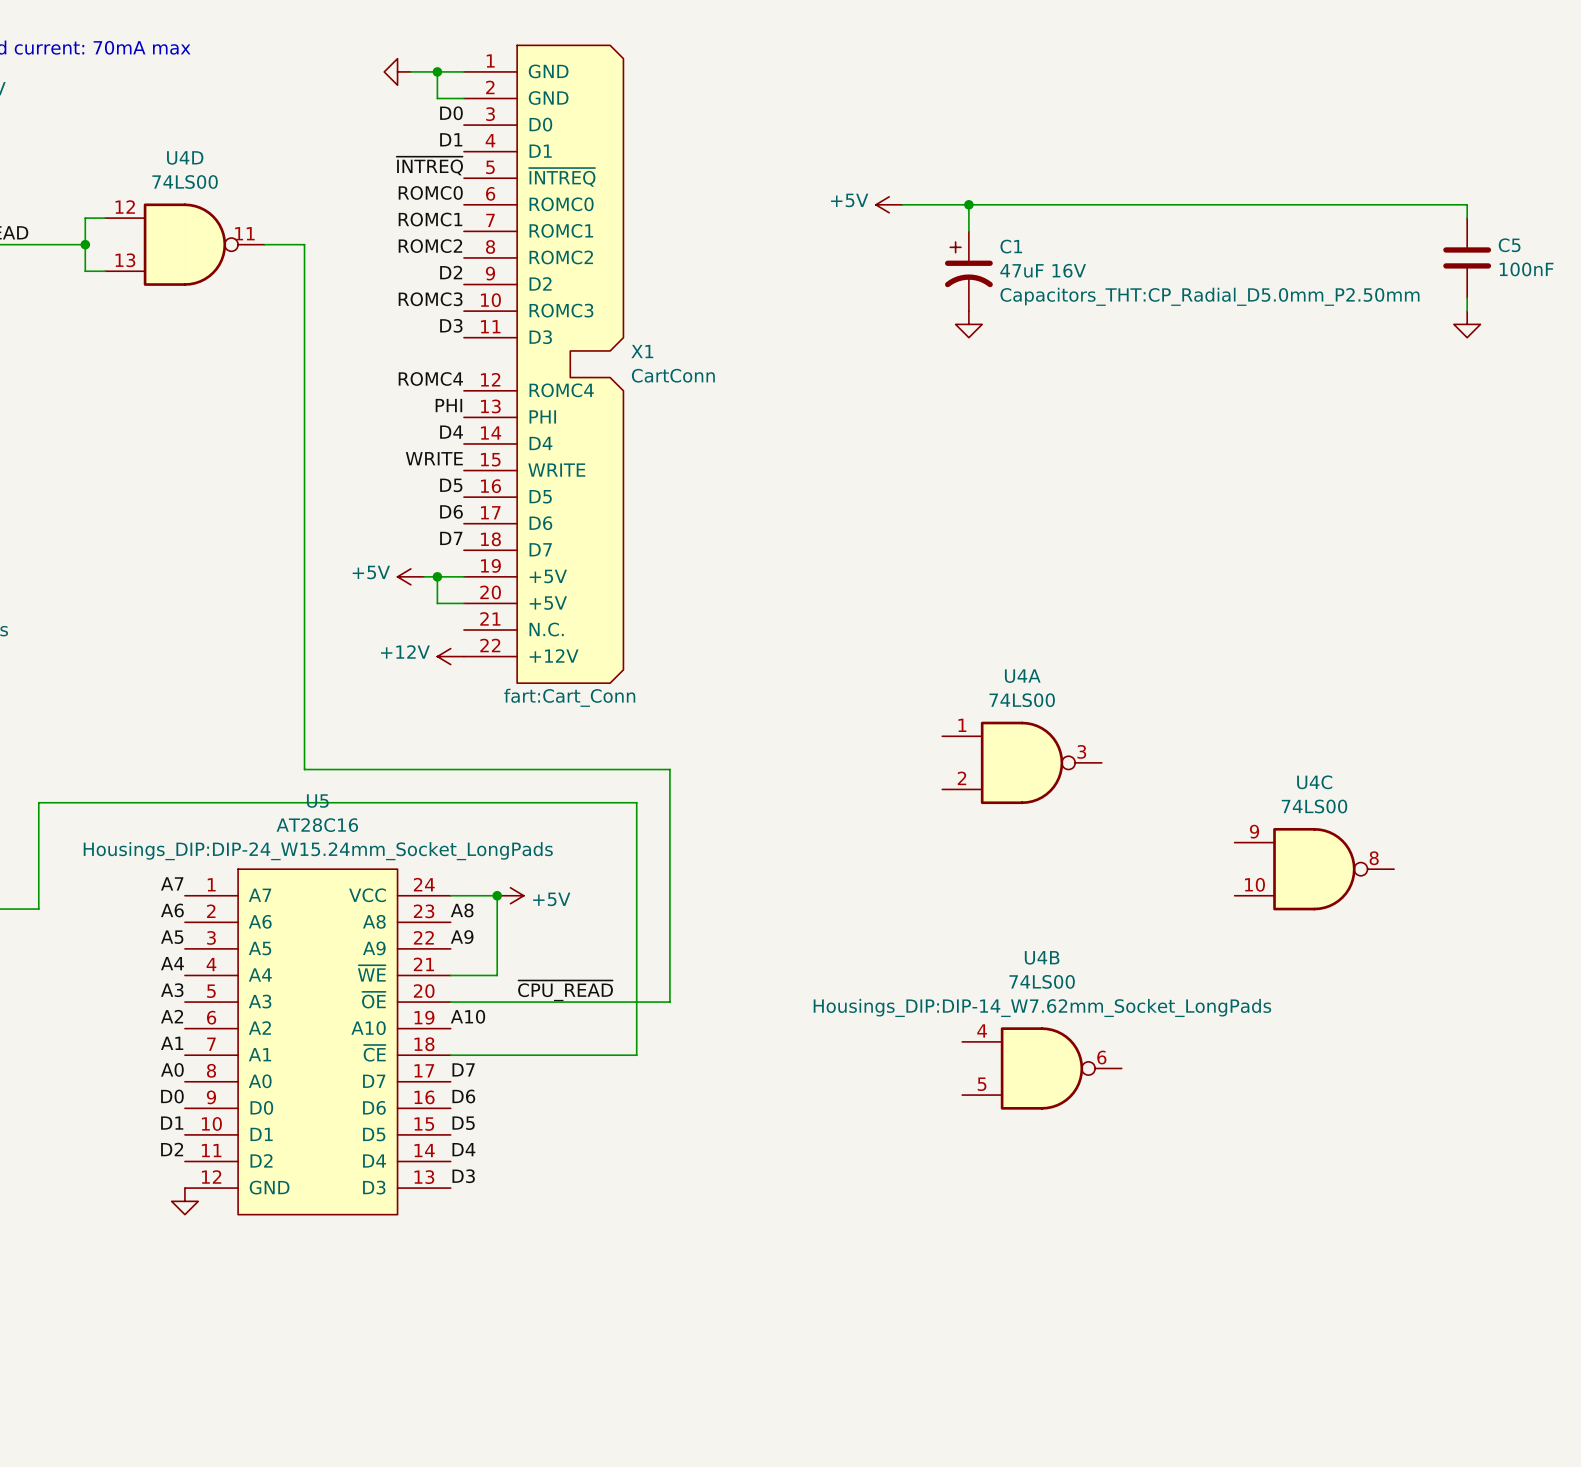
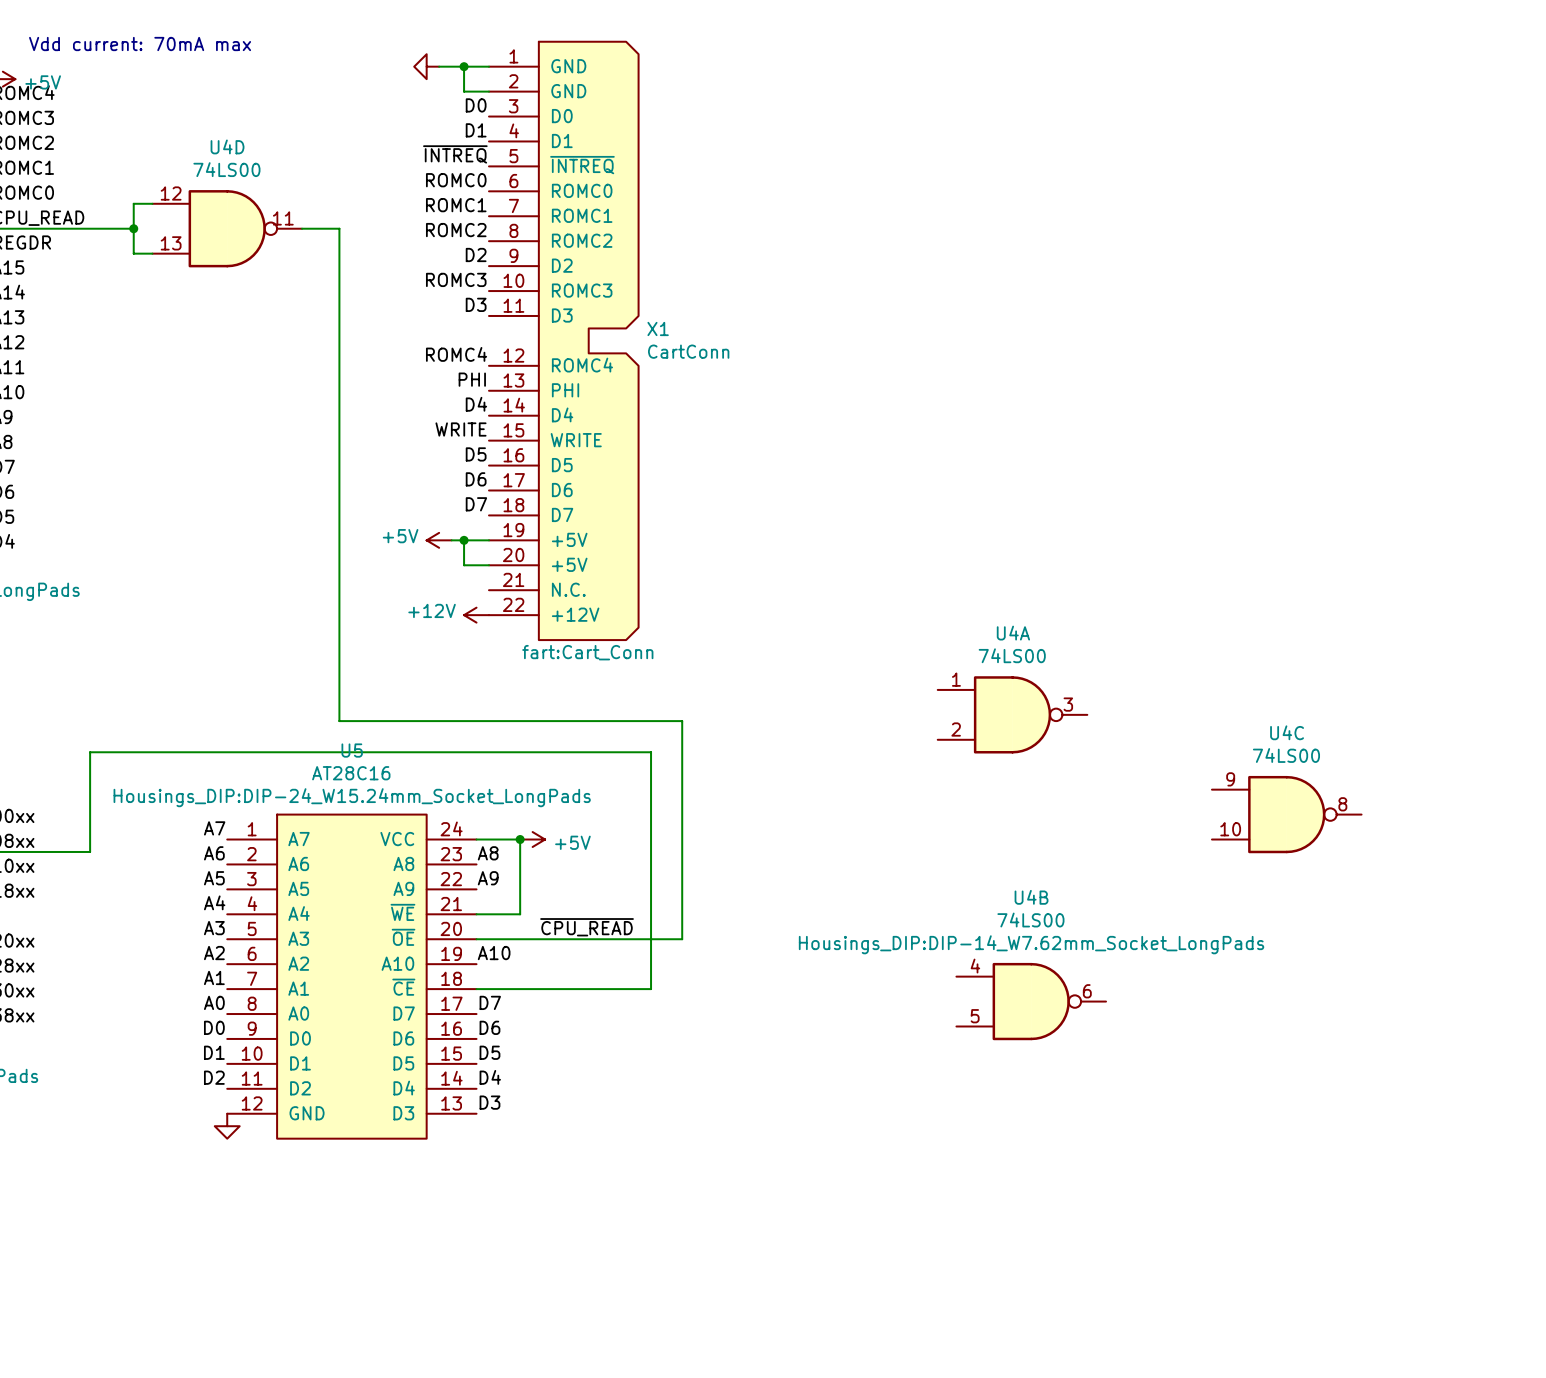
power symbol: +5V (889, 204) -> none
wire: (902, 204) (1467, 204) (1467, 218) -> none
wire: (968, 204) (968, 231) -> none
junction: (968, 204) -> none
C5: 100nF (1467, 257) -> none
C1: 47uF 16V (968, 271) -> none
wire: (1467, 297) (1467, 311) -> none
power symbol: (968, 324) -> none
power symbol: (1467, 324) -> none

